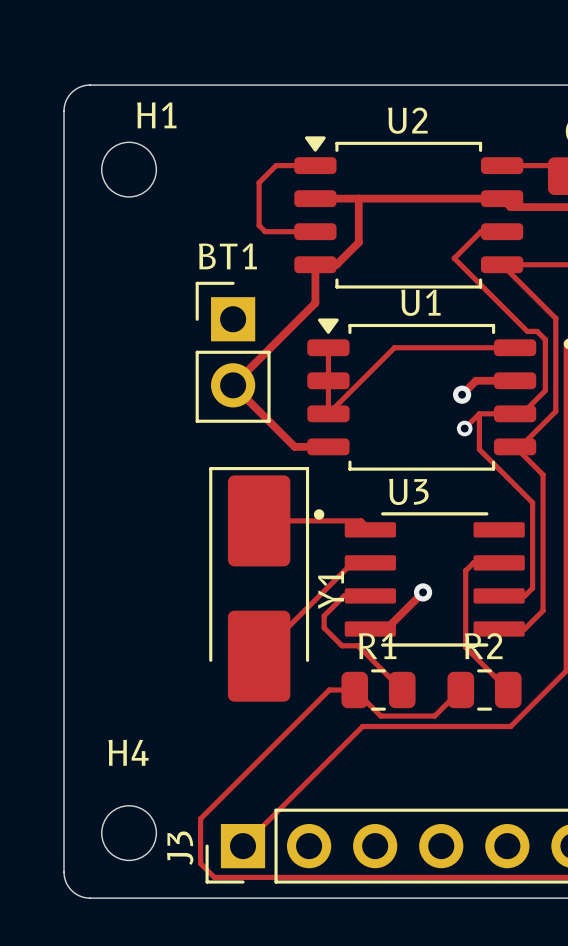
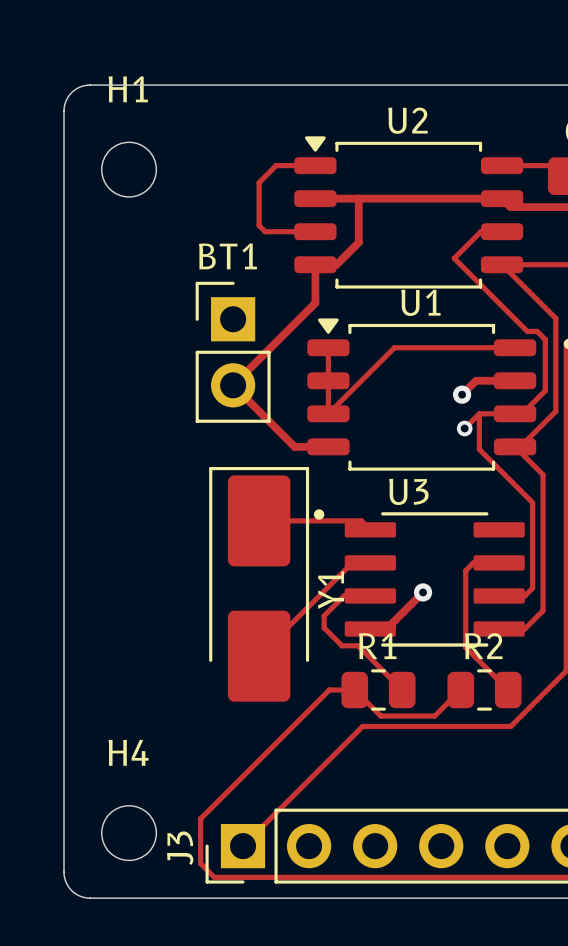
H1 name position: H1 (156, 115) -> H1 (128, 89)

